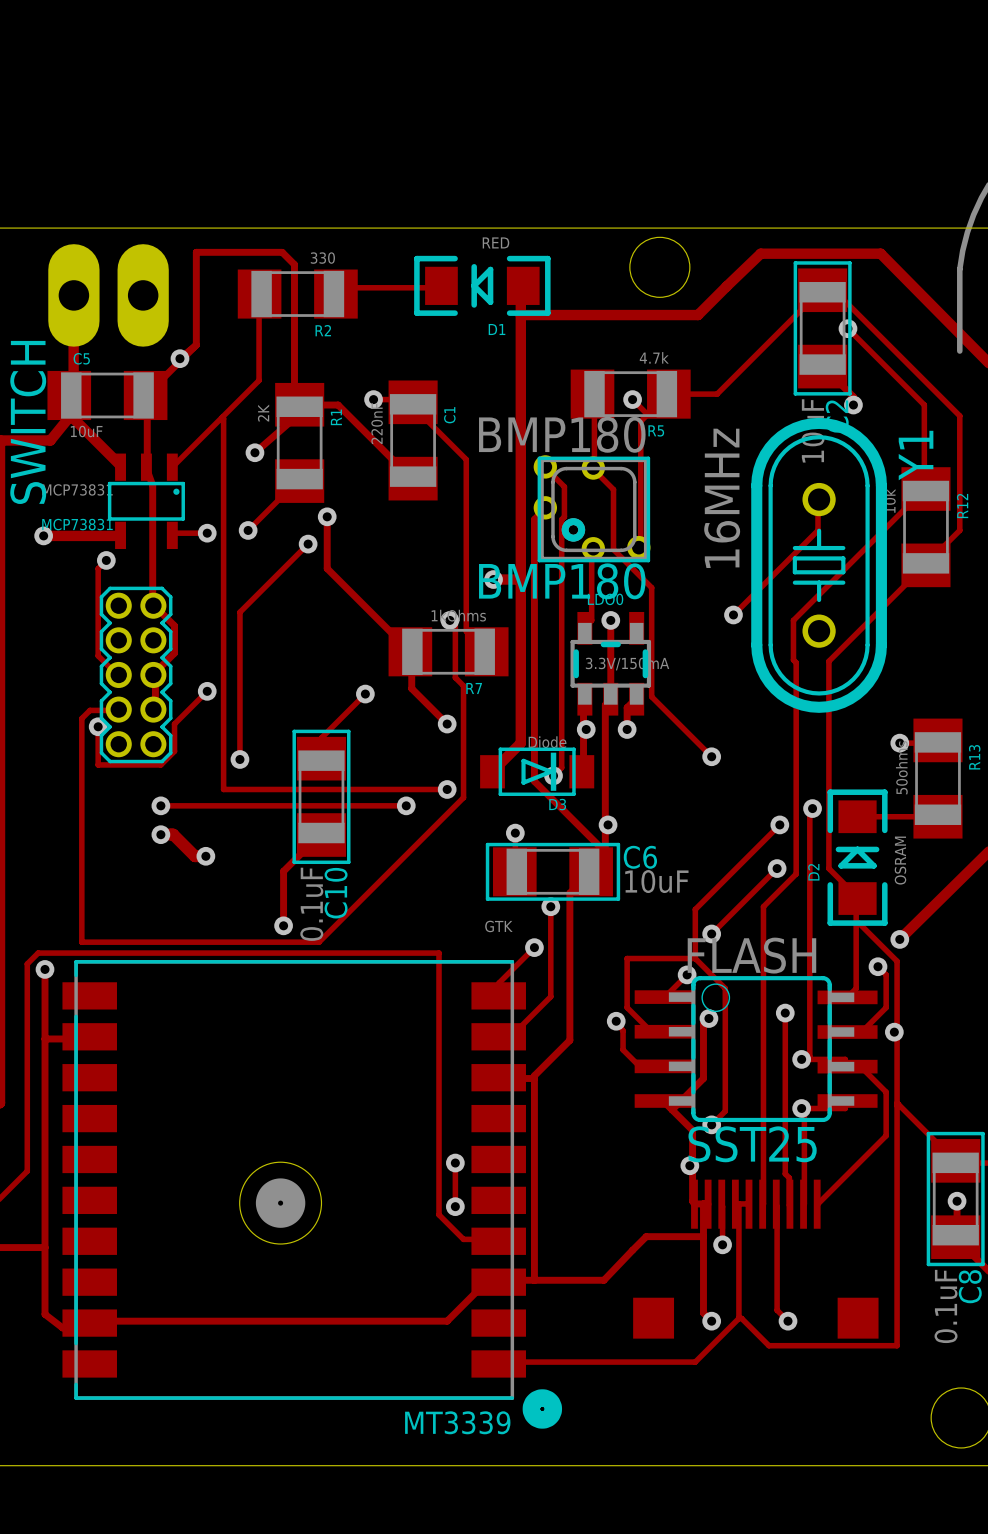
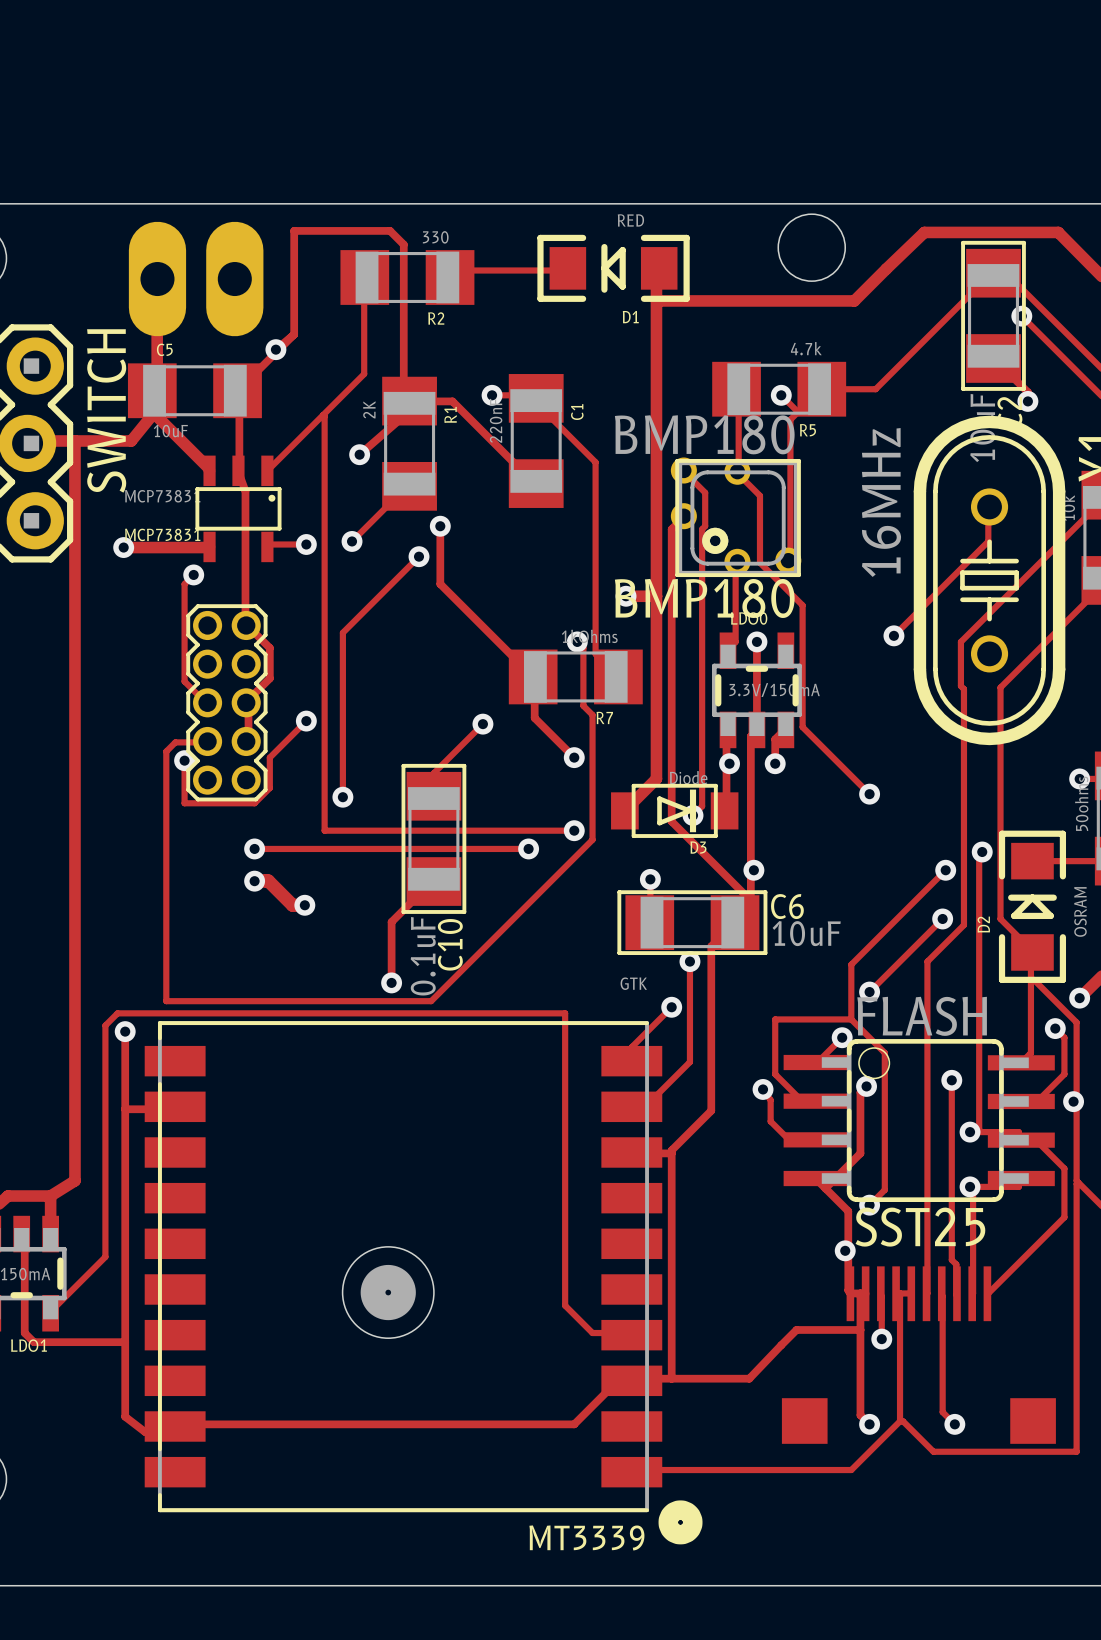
track: (455, 1163) (455, 1206) -> none
via: (455, 1163) -> none
via: (455, 1206) -> none

